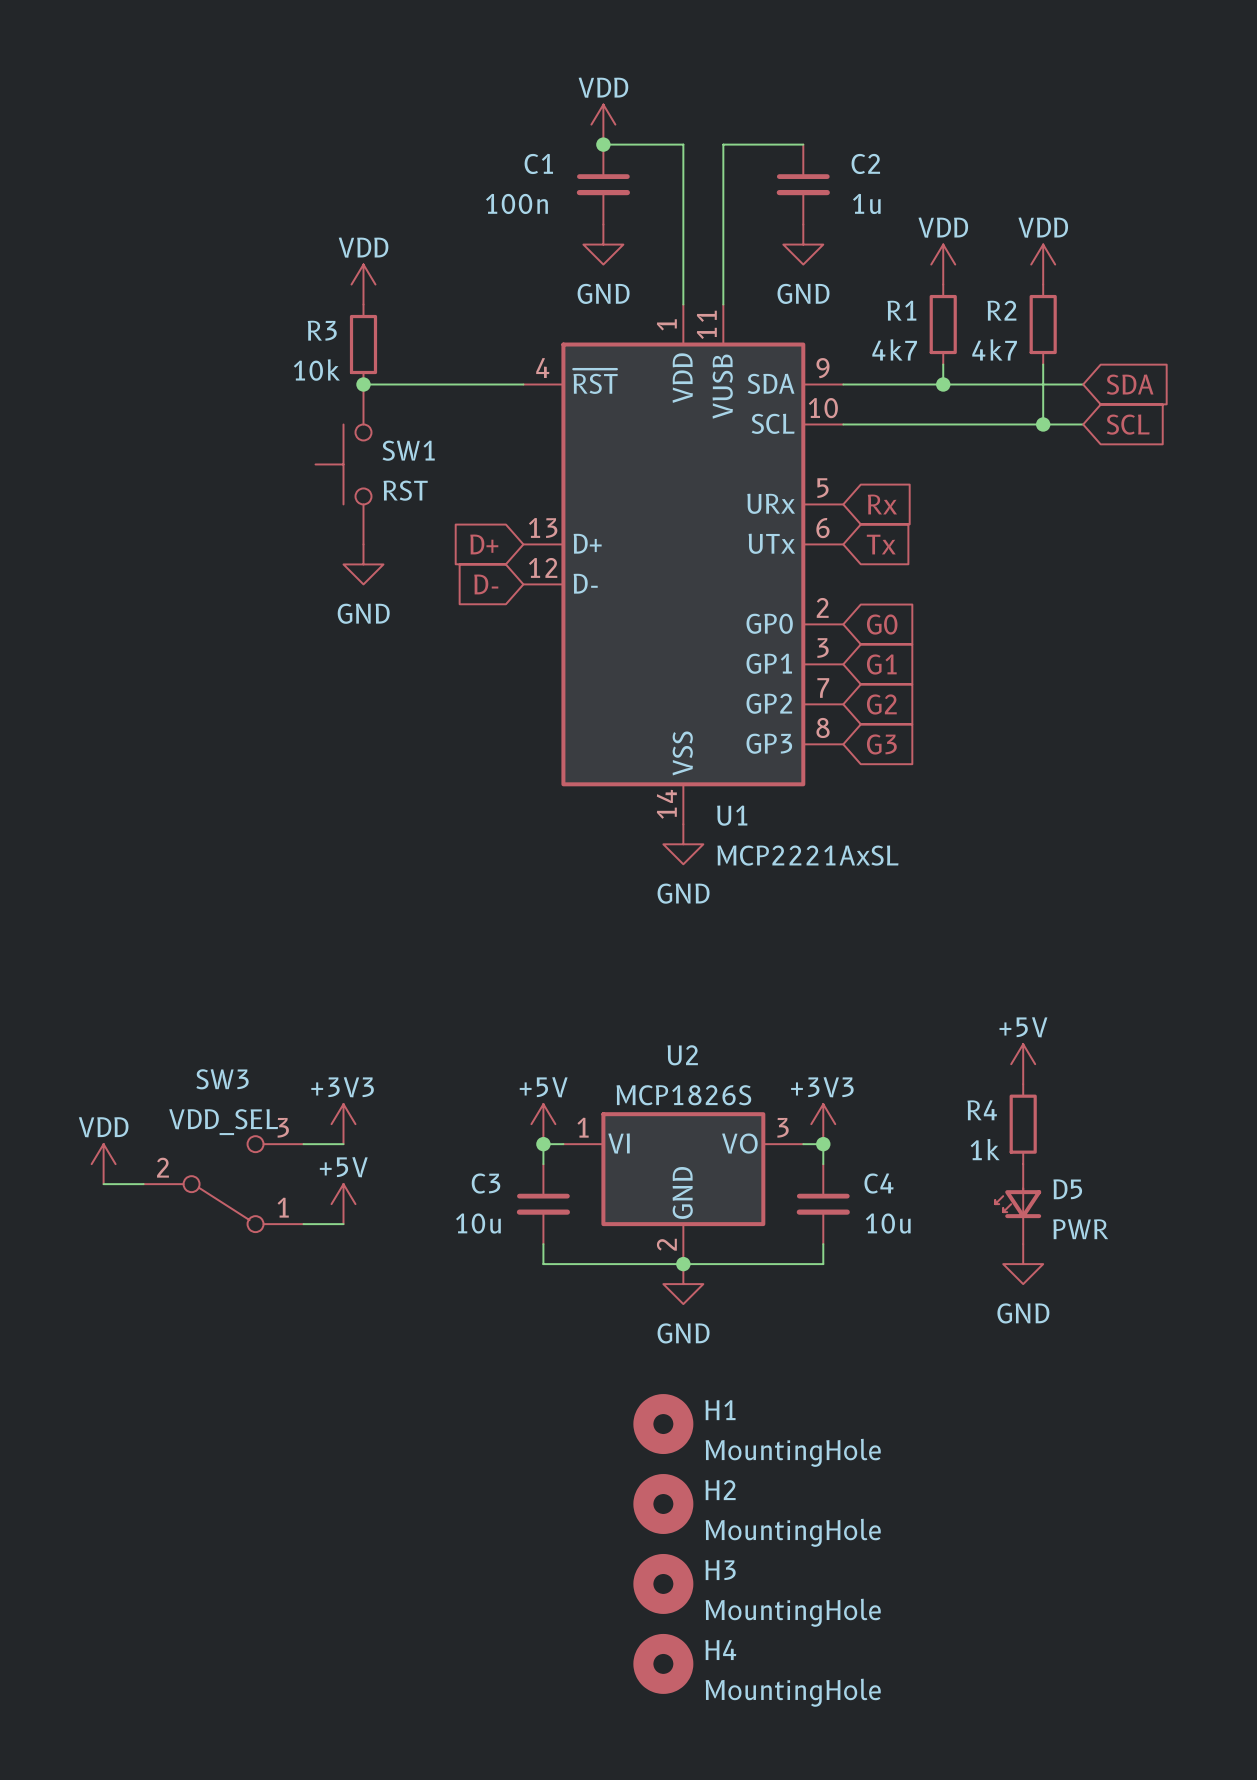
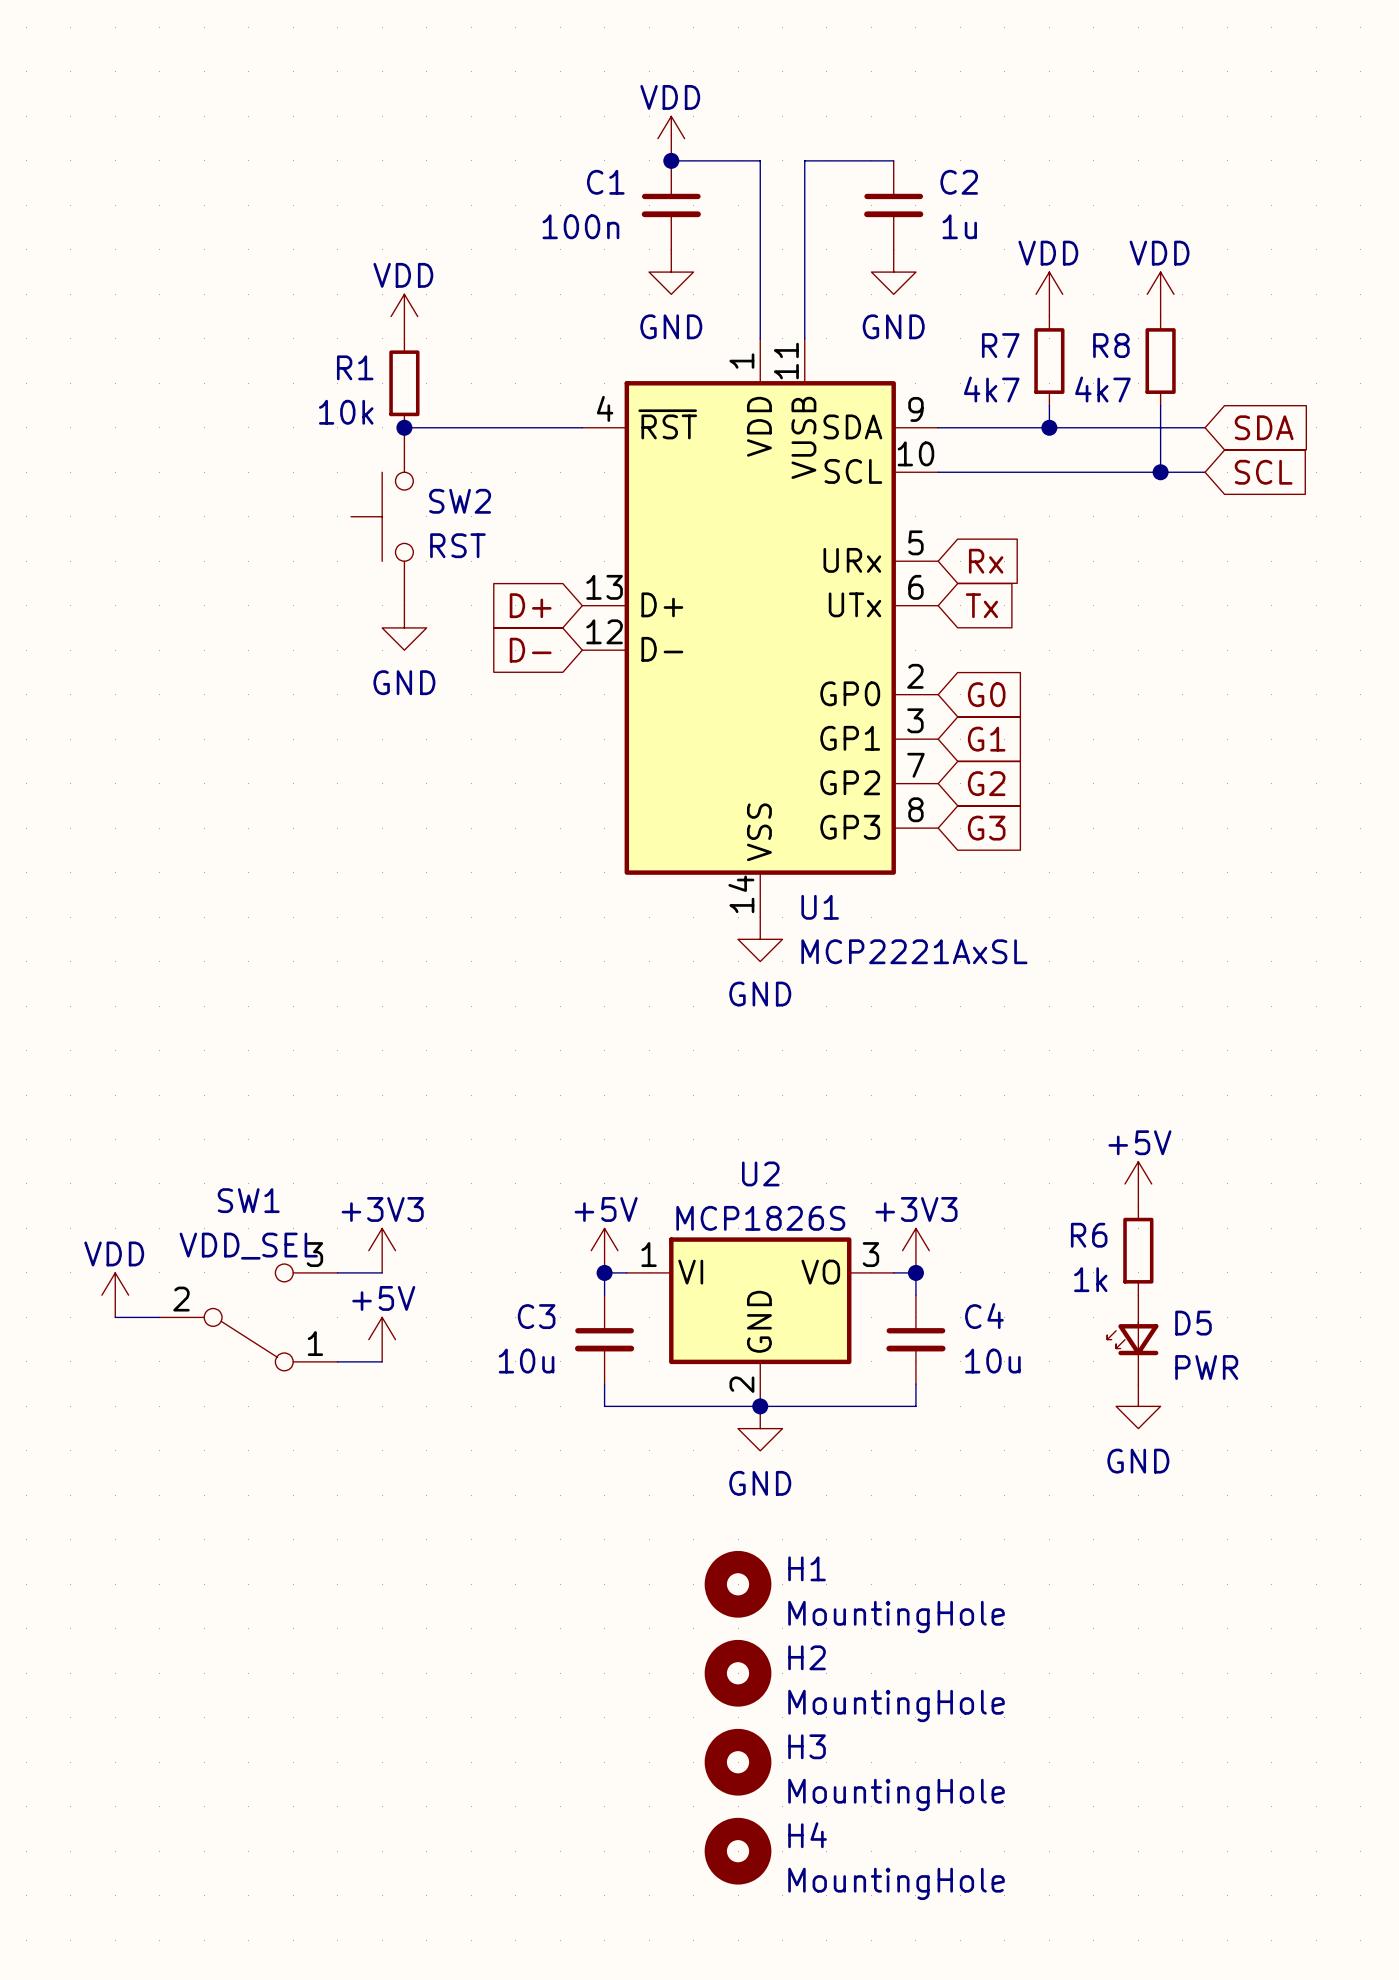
R1 name: R1 (901, 310) -> R7 (1000, 345)
R2 name: R2 (1001, 310) -> R8 (1111, 345)
R3 name: R3 (322, 330) -> R1 (355, 367)
SW1 name: SW1 (408, 450) -> SW2 (460, 501)
SW3 name: SW3 (222, 1079) -> SW1 (248, 1200)
R4 name: R4 (982, 1110) -> R6 (1089, 1235)

